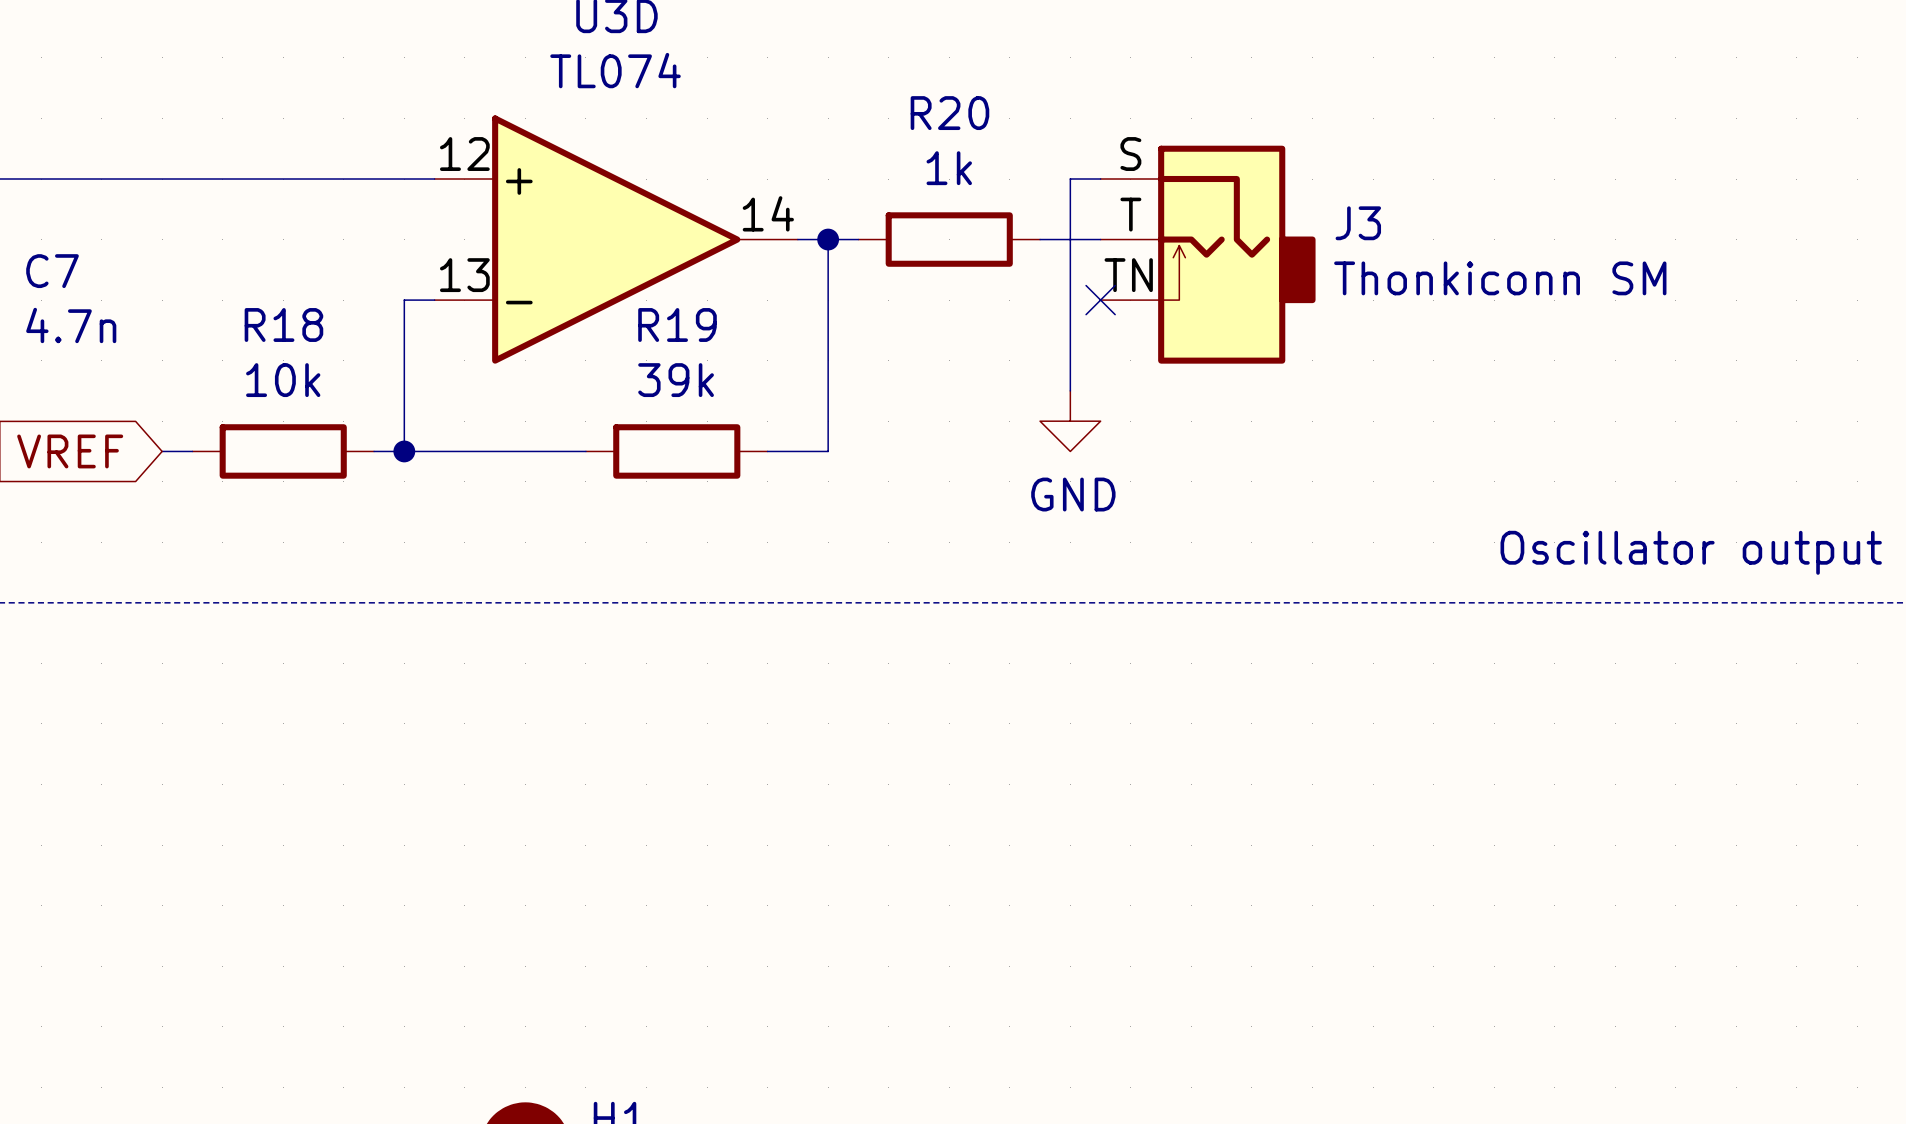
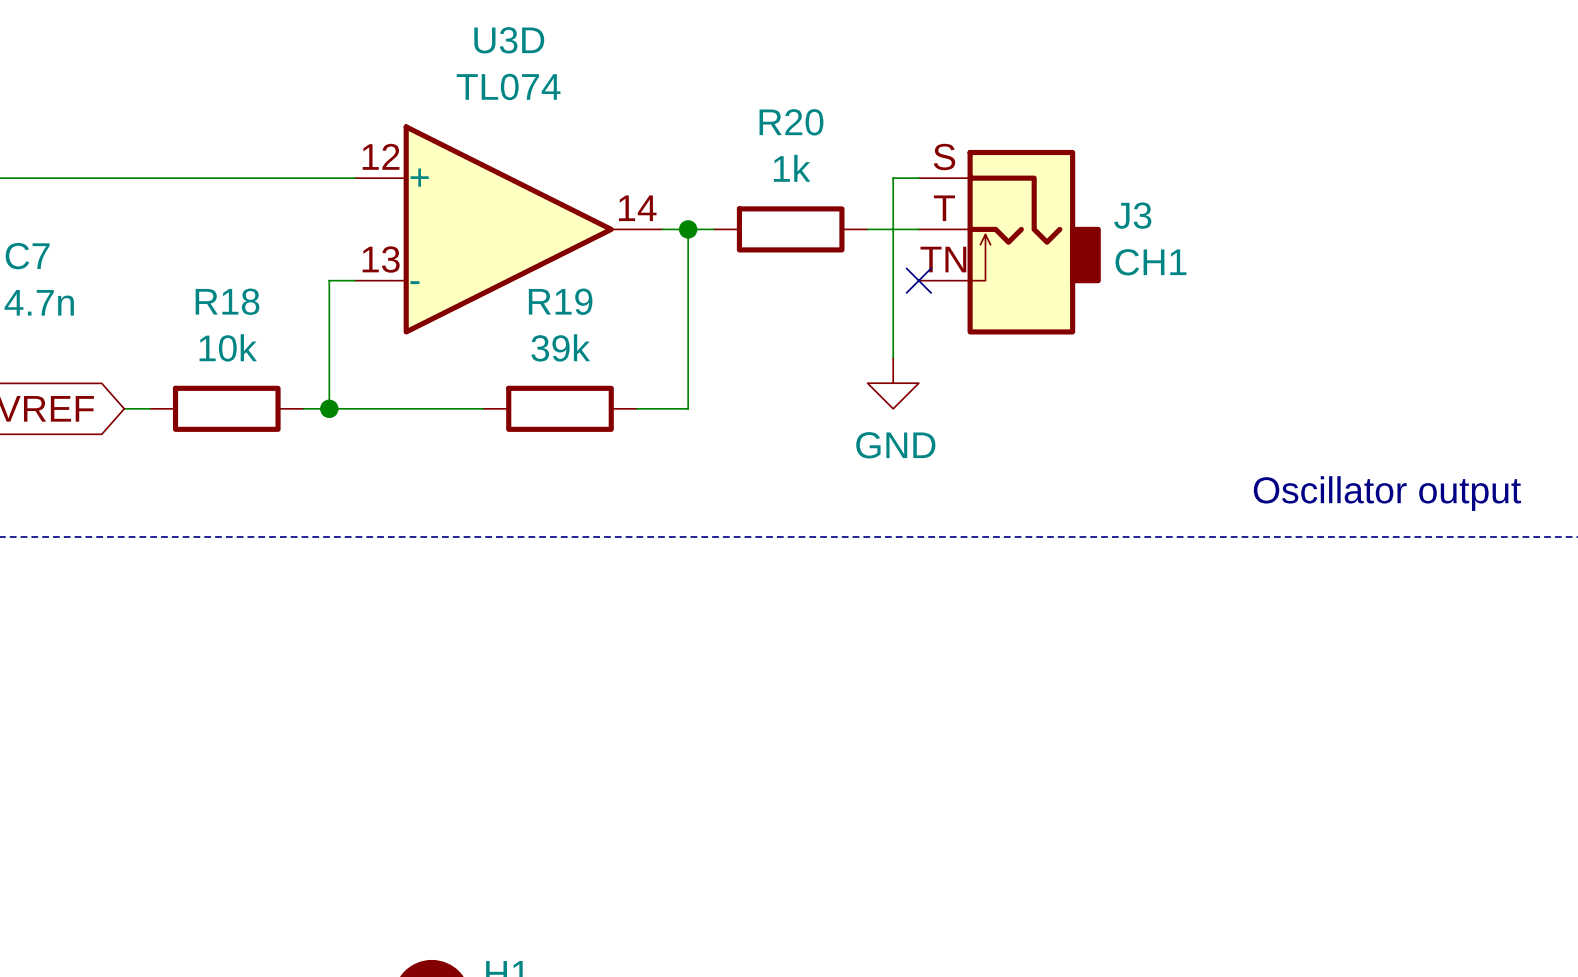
J3 value: Thonkiconn SM (1500, 278) -> CH1 (1150, 262)

